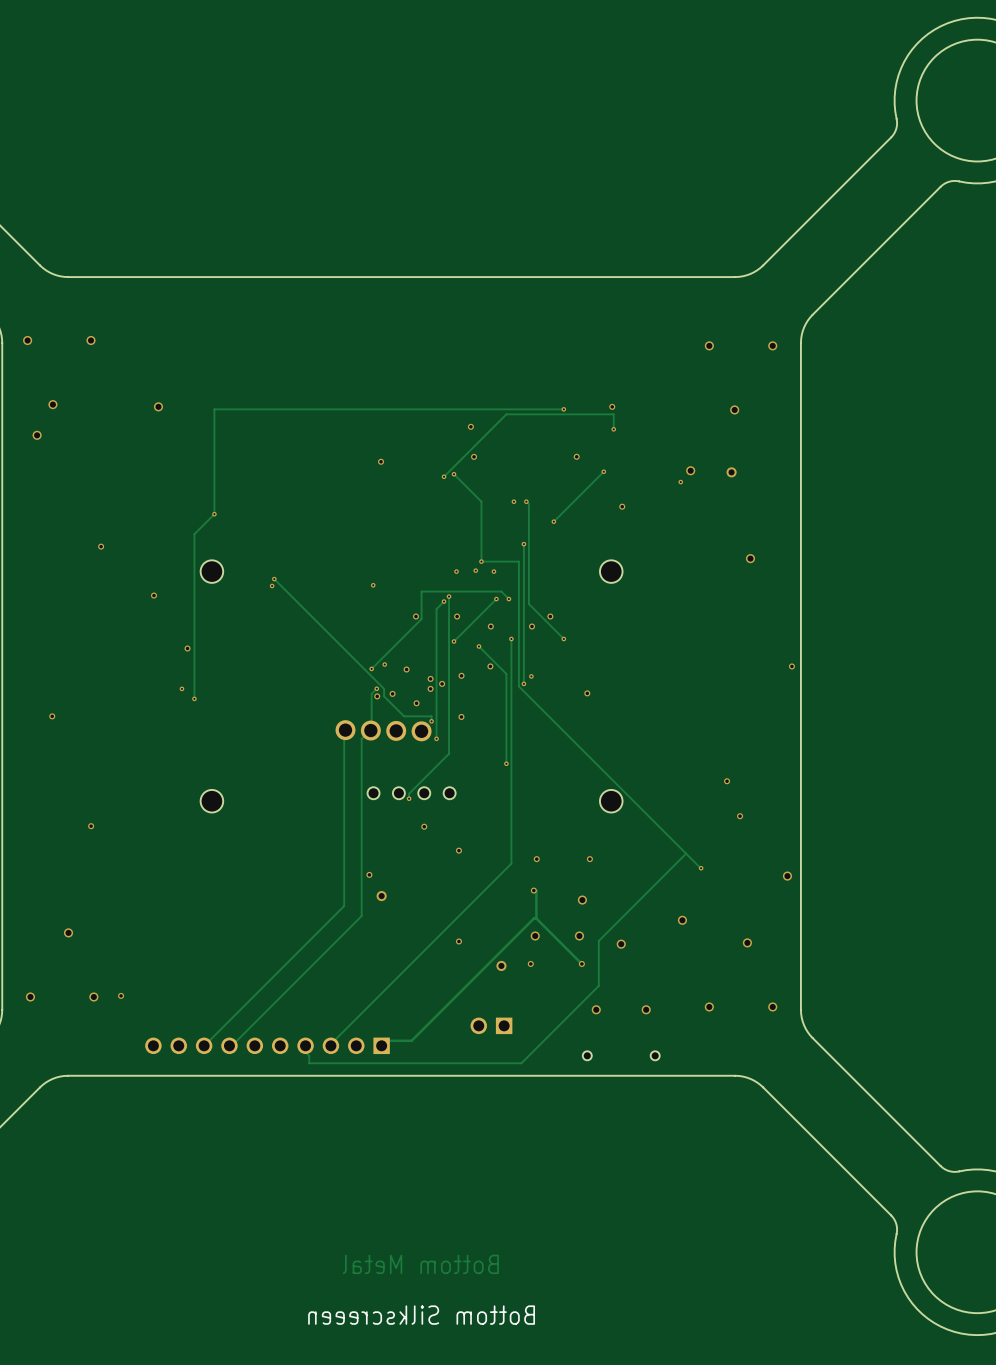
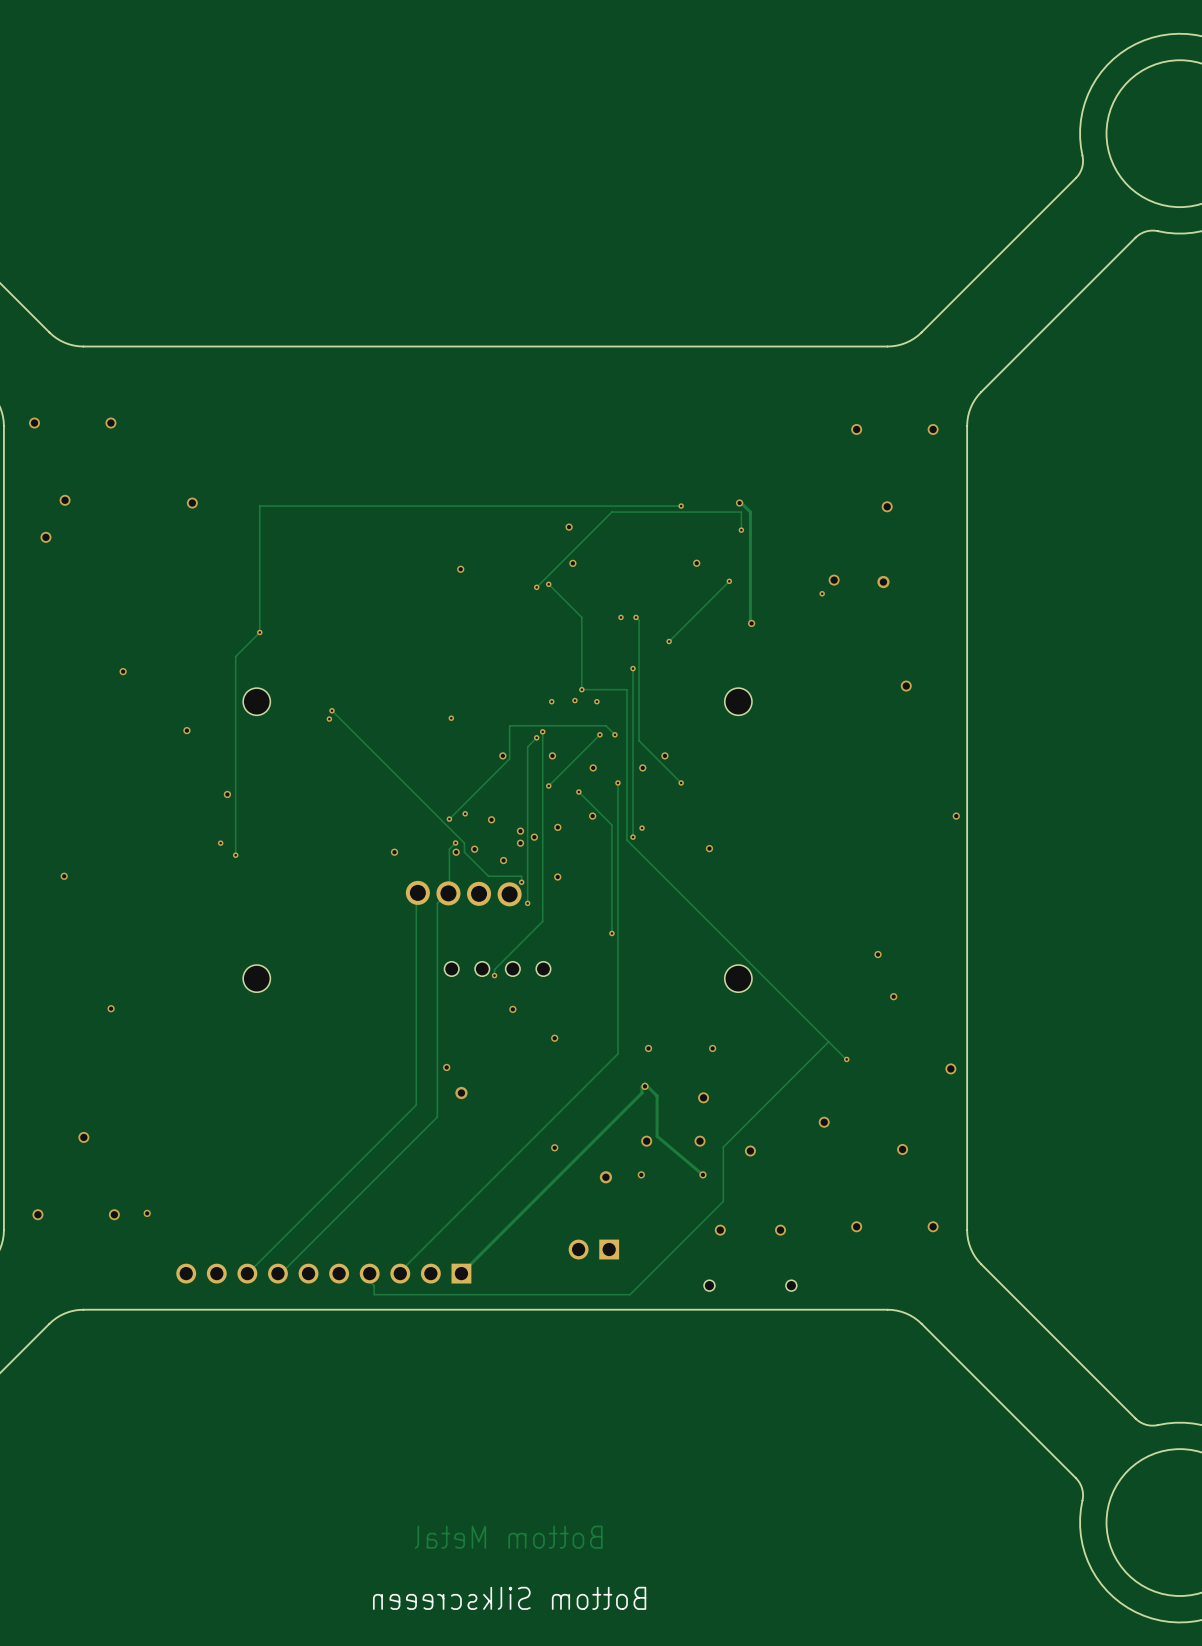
track: none -> (739, 503) (750, 512) (751, 623)
via: none -> (394, 852)
track: (533, 890) (536, 891) (536, 918) -> none
track: (536, 918) (533, 918) (411, 1040) (386, 1040) -> (702, 1174) (657, 1136) (657, 1096) (645, 1083) (645, 1086) (642, 1086) (642, 1093) (467, 1267)
track: (536, 918) (581, 963) -> none

